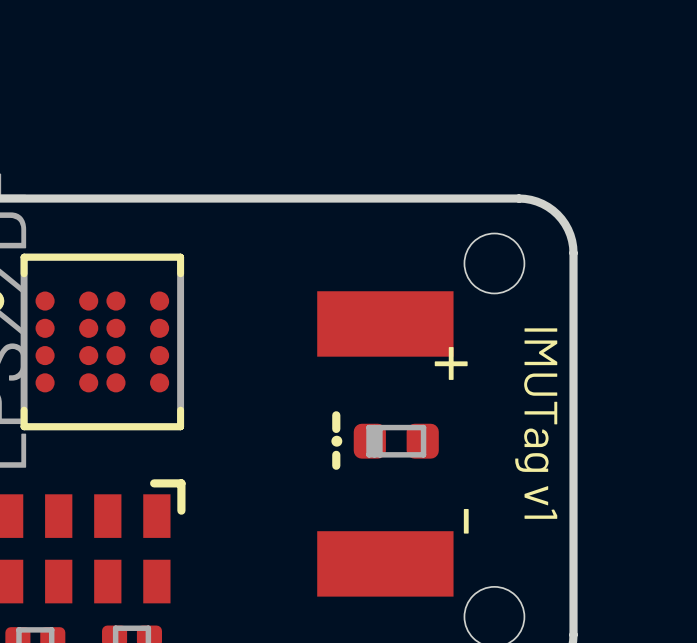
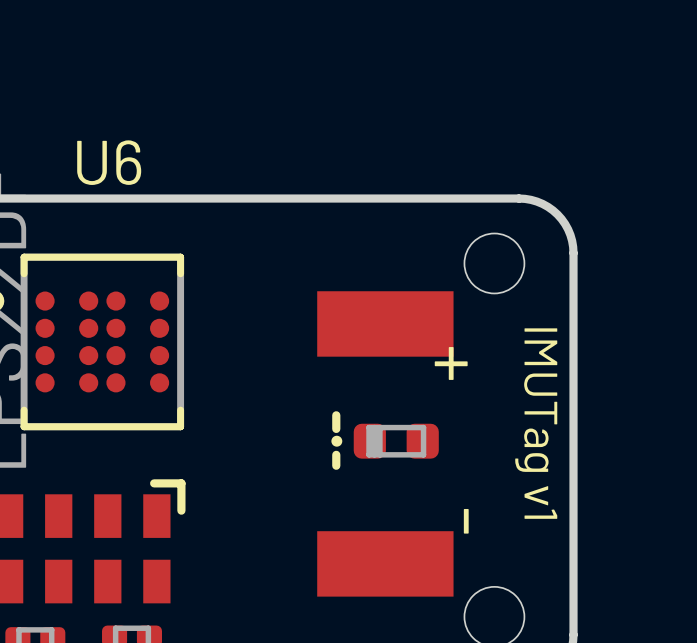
U6 name: none -> U6 (109, 162)

